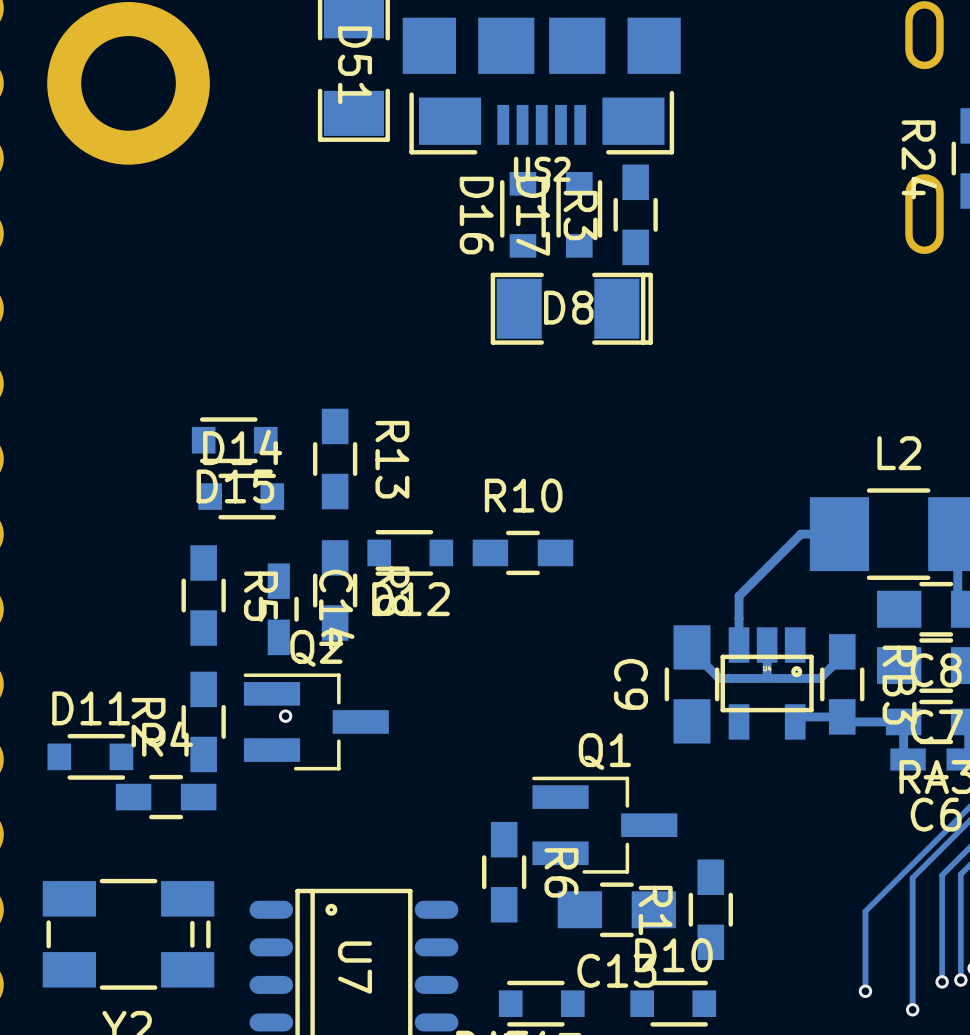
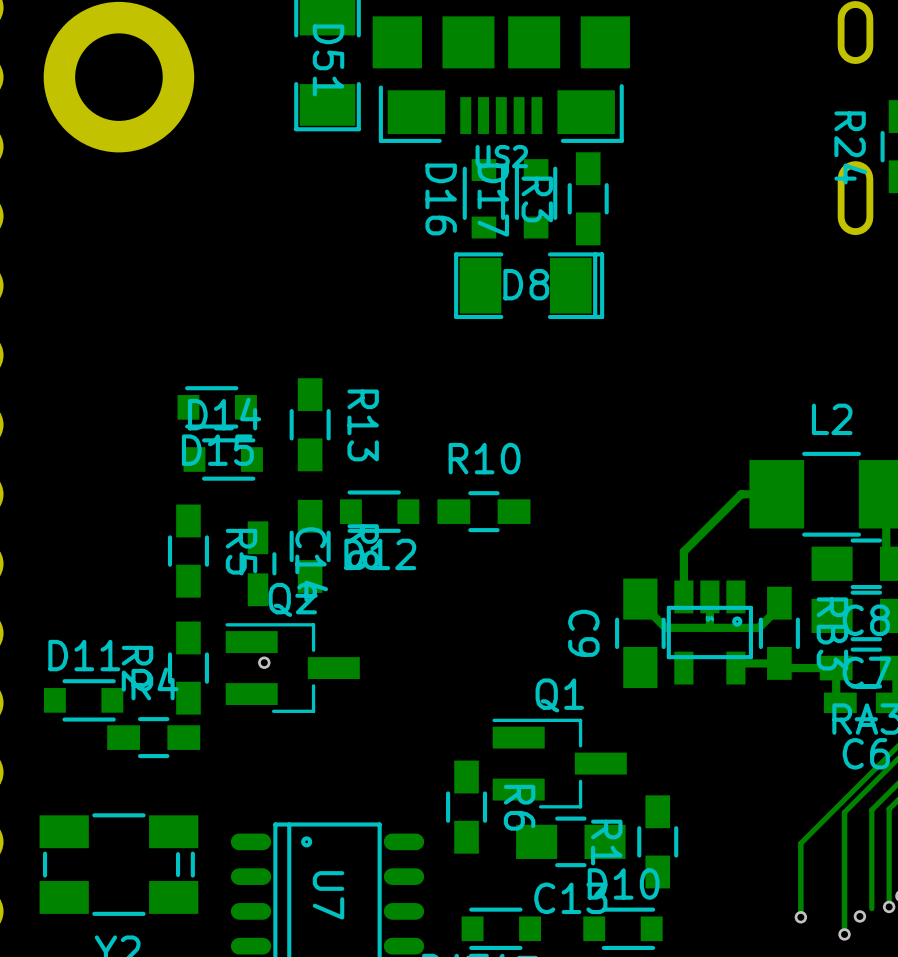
via position: (942, 981) -> (859, 916)

